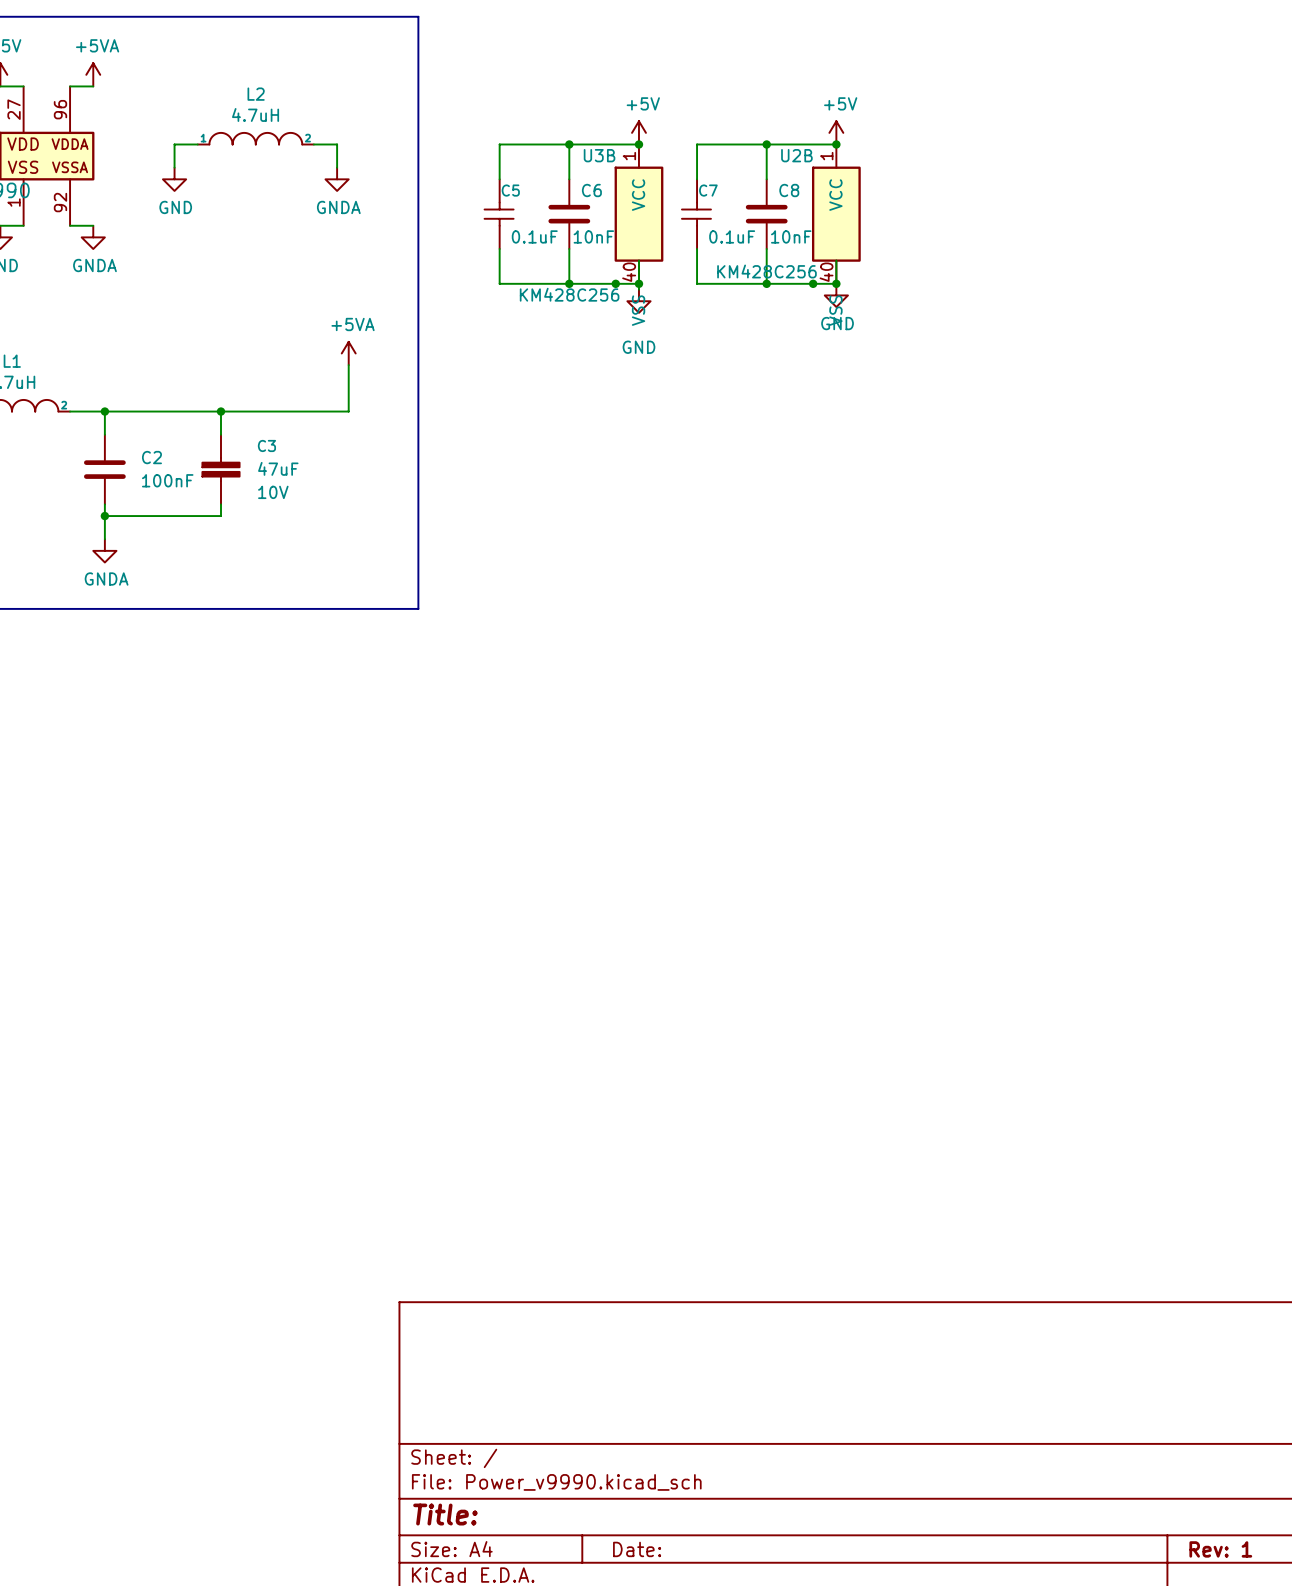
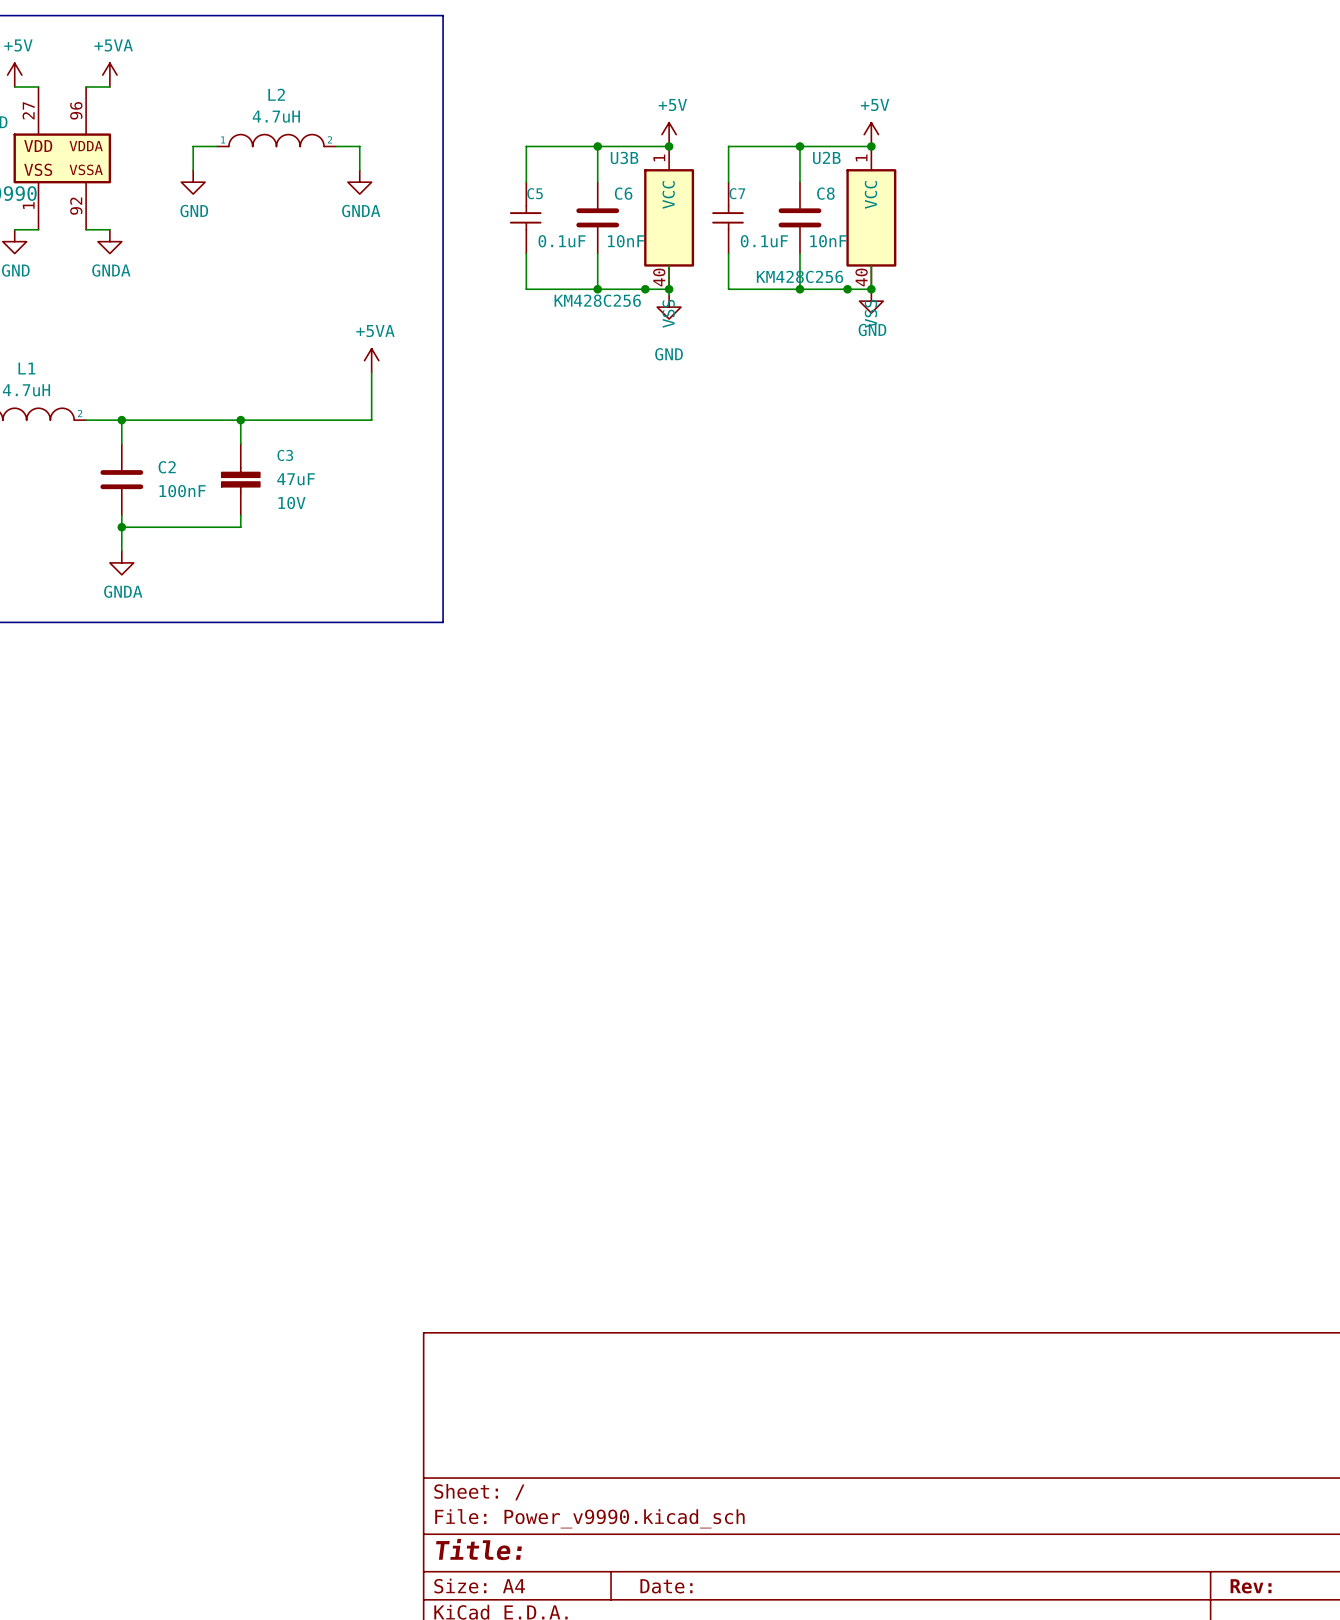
title block: Rev: 1 (1220, 1549) -> Rev: (1251, 1586)

